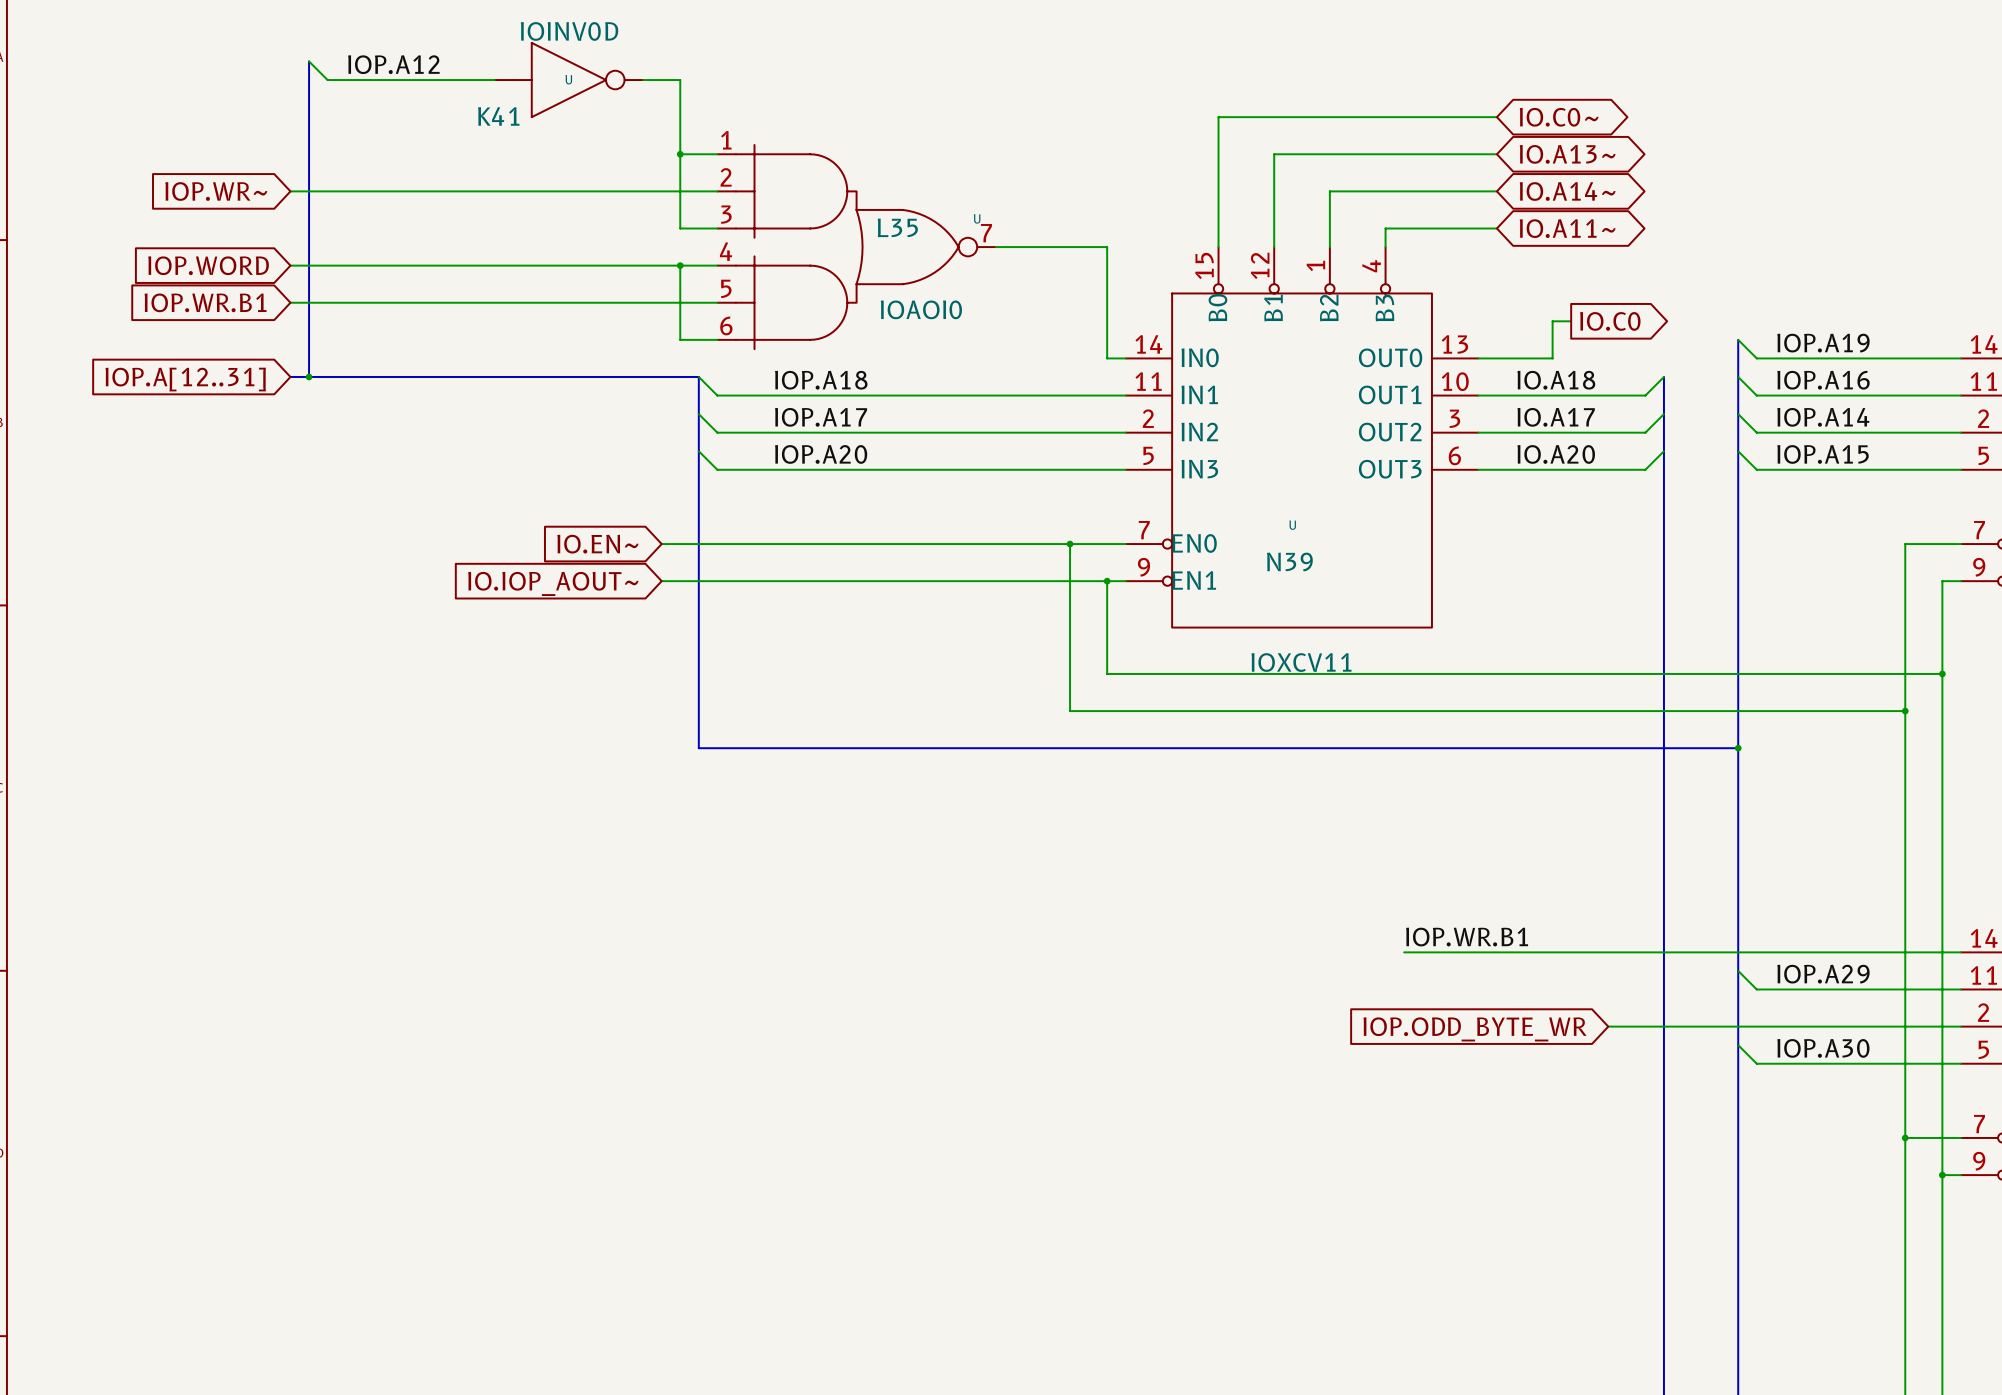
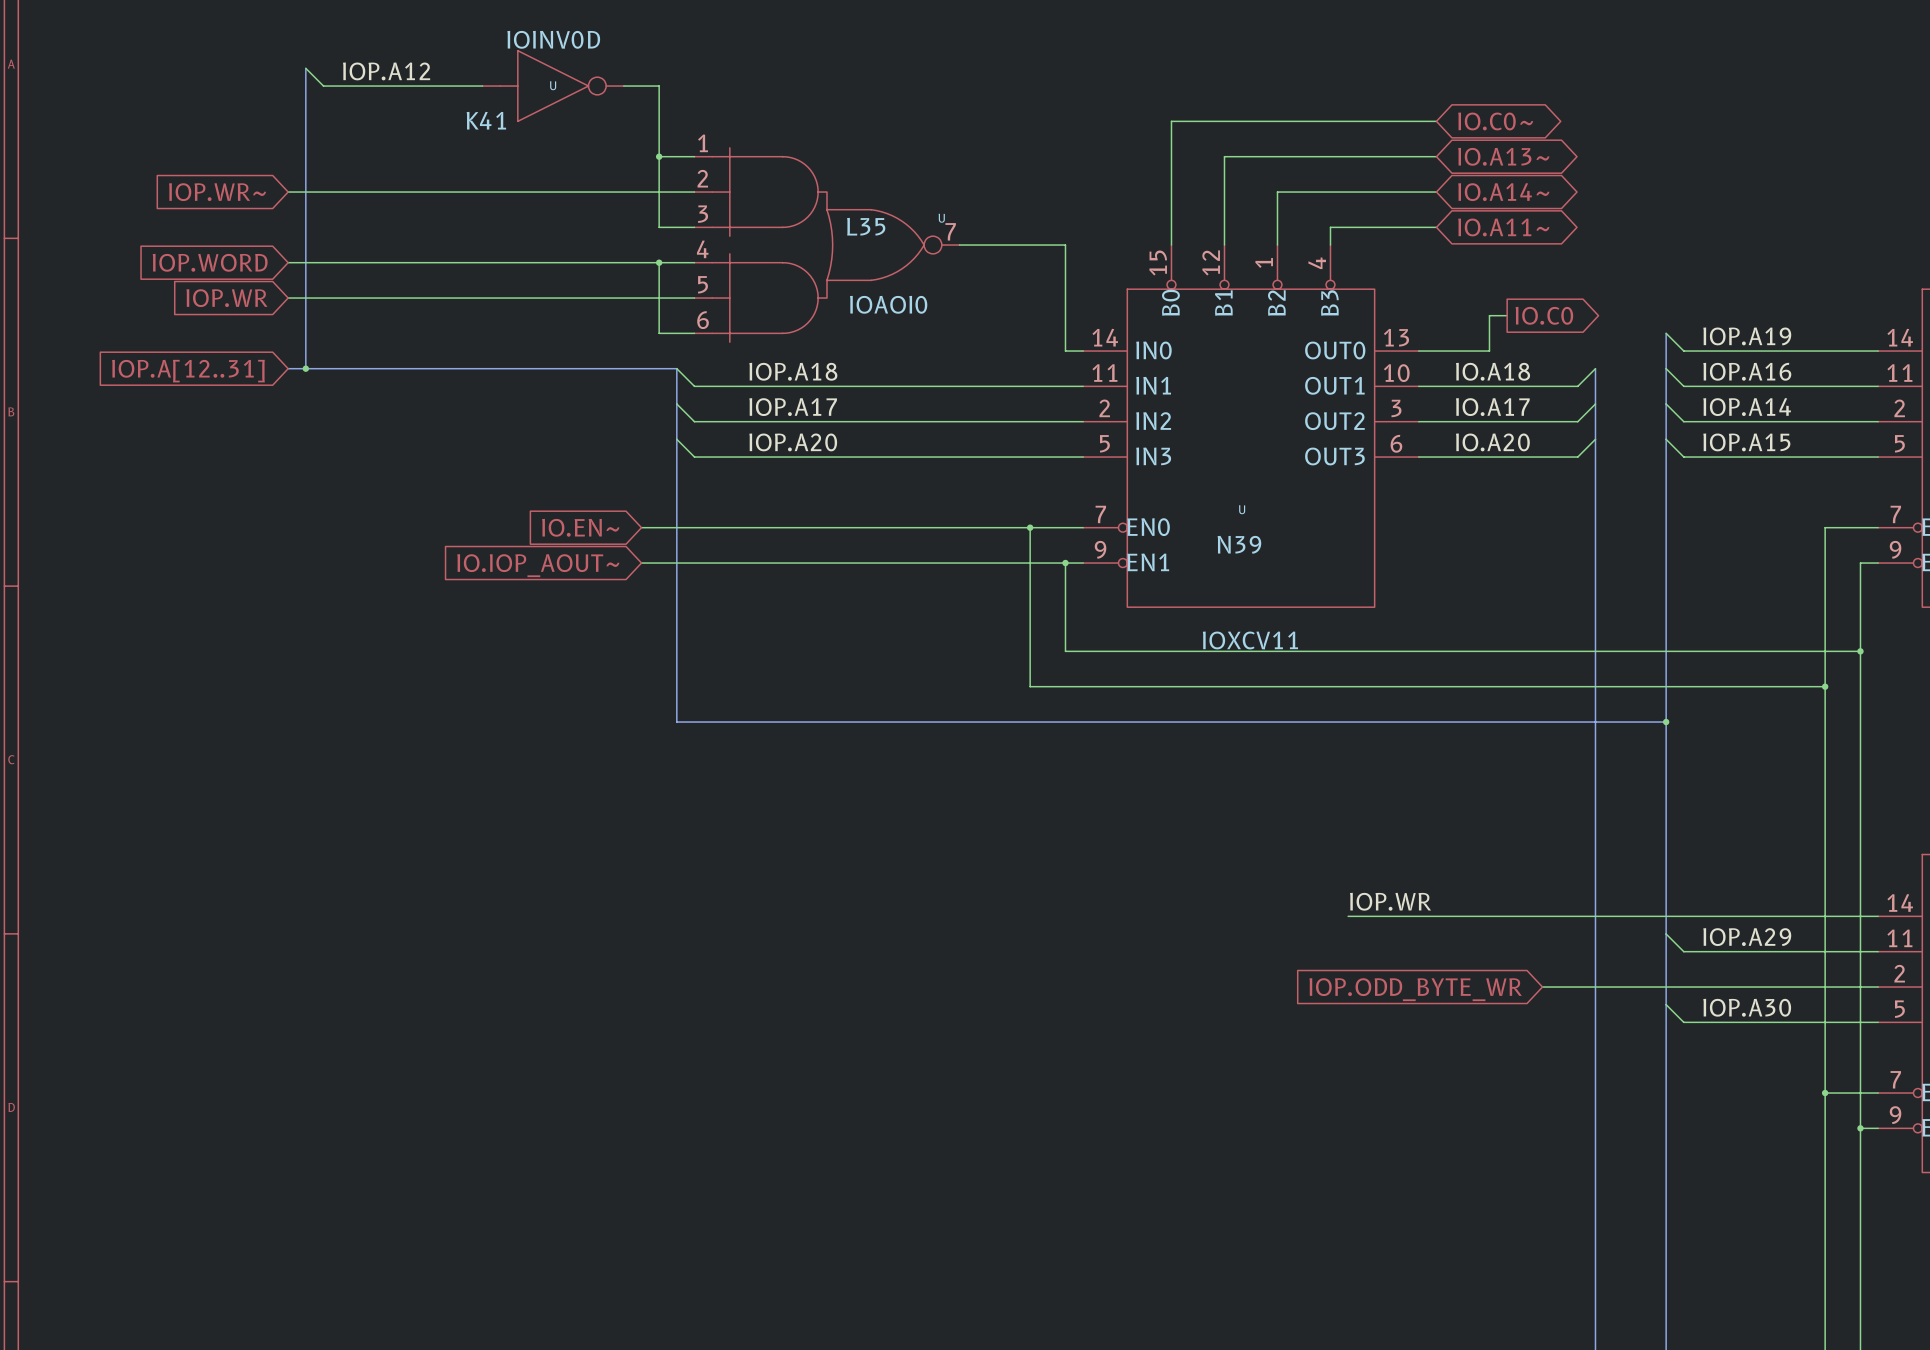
global label: IOP.WR.B1 (205, 302) -> IOP.WR (226, 298)
label: IOP.WR.B1 (1467, 937) -> IOP.WR (1390, 901)

